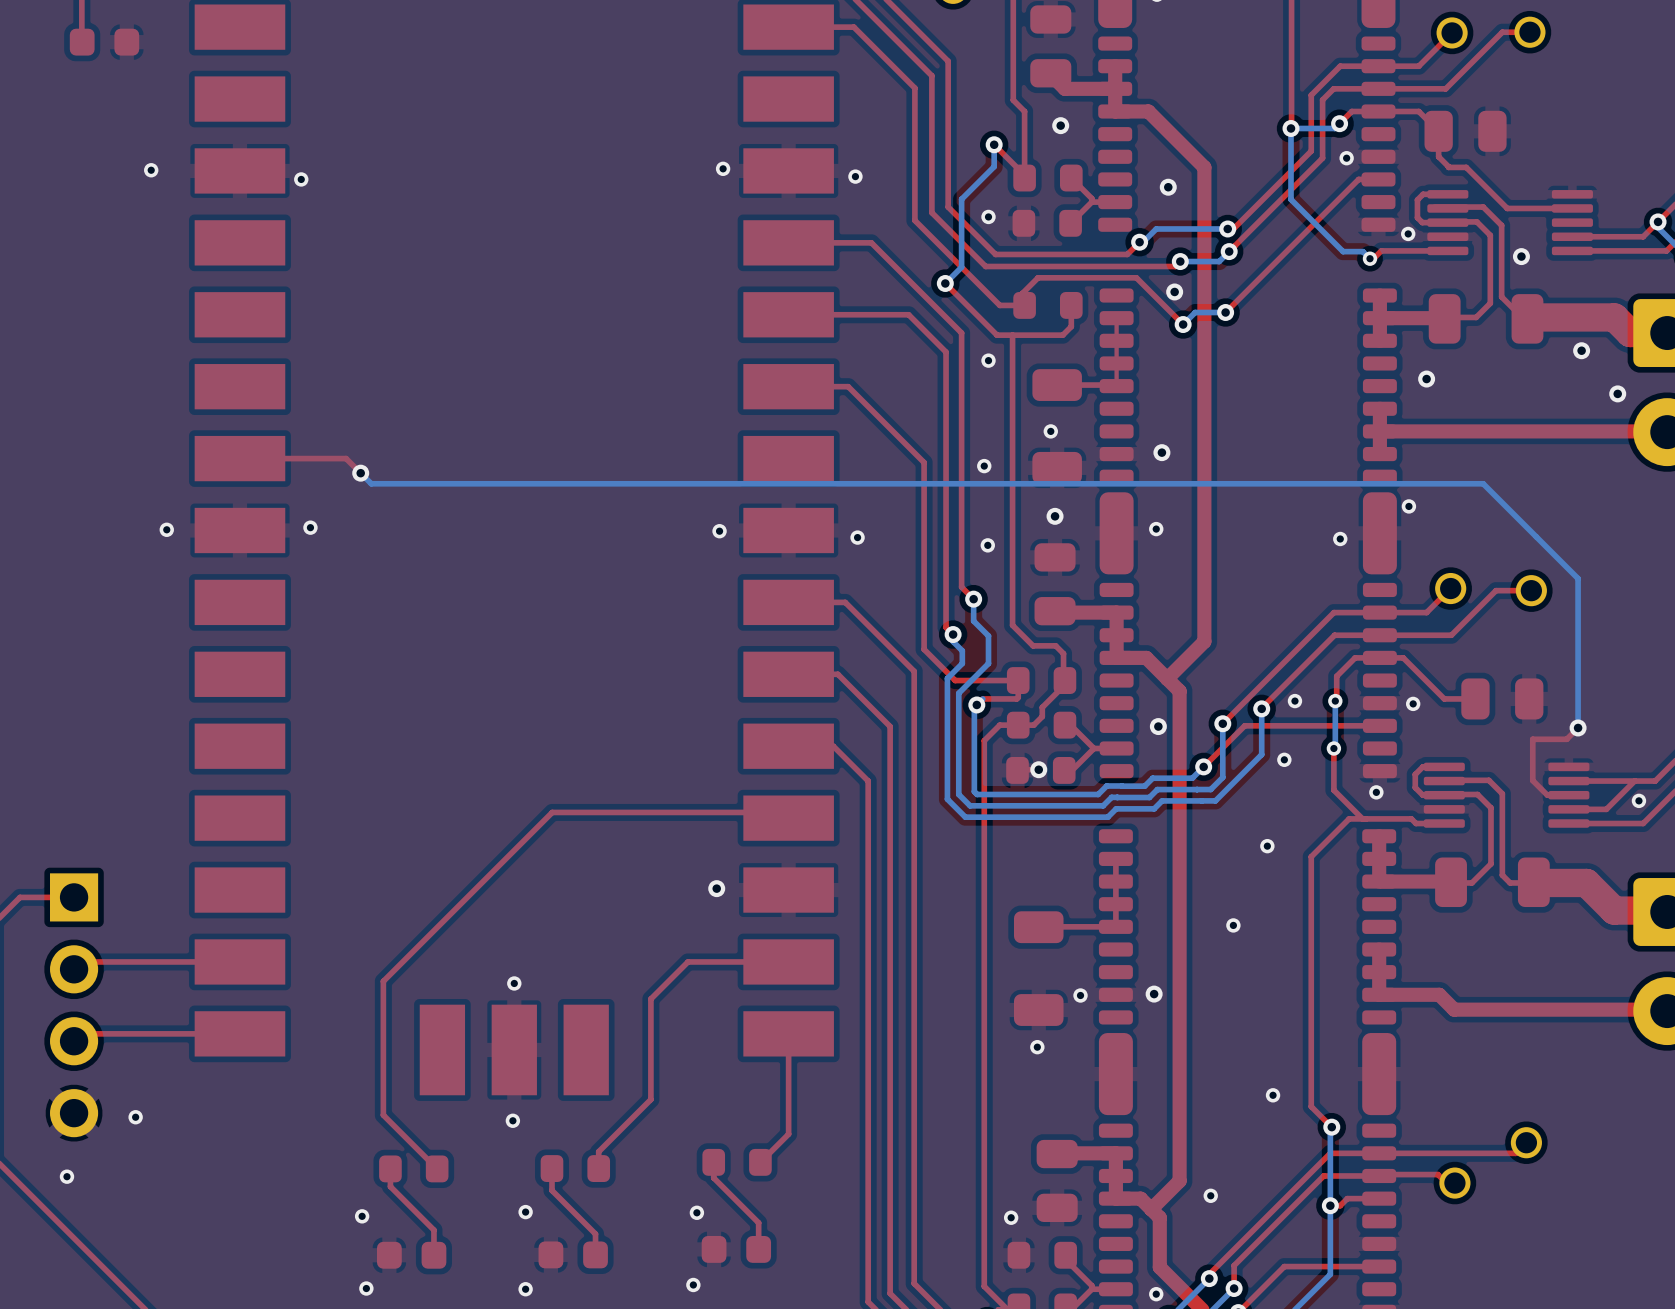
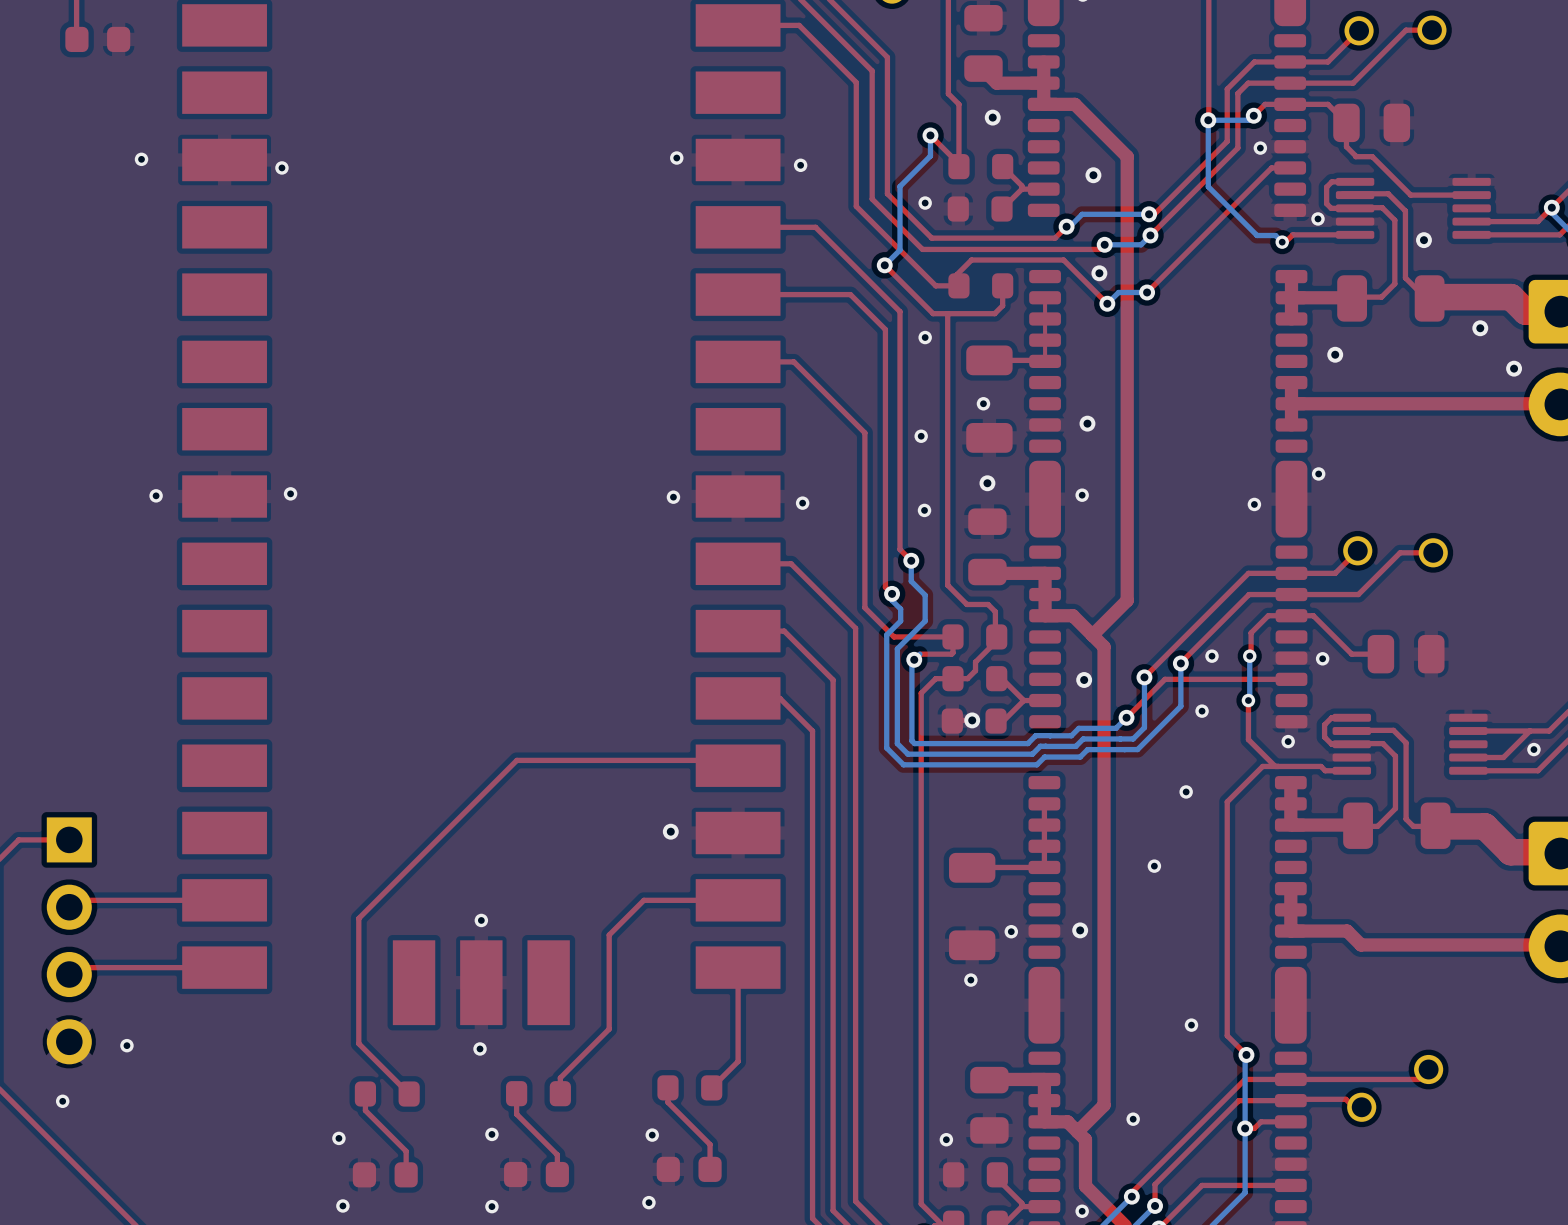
top track: (239, 458) (346, 458) (360, 473) -> none
bottom track: (360, 473) (371, 483) (1483, 483) (1578, 578) (1578, 727) -> none
via: (360, 473) -> none
top track: (1578, 727) (1566, 739) (1532, 739) (1532, 780) (1547, 795) (1568, 795) -> none
via: (1578, 727) -> none

